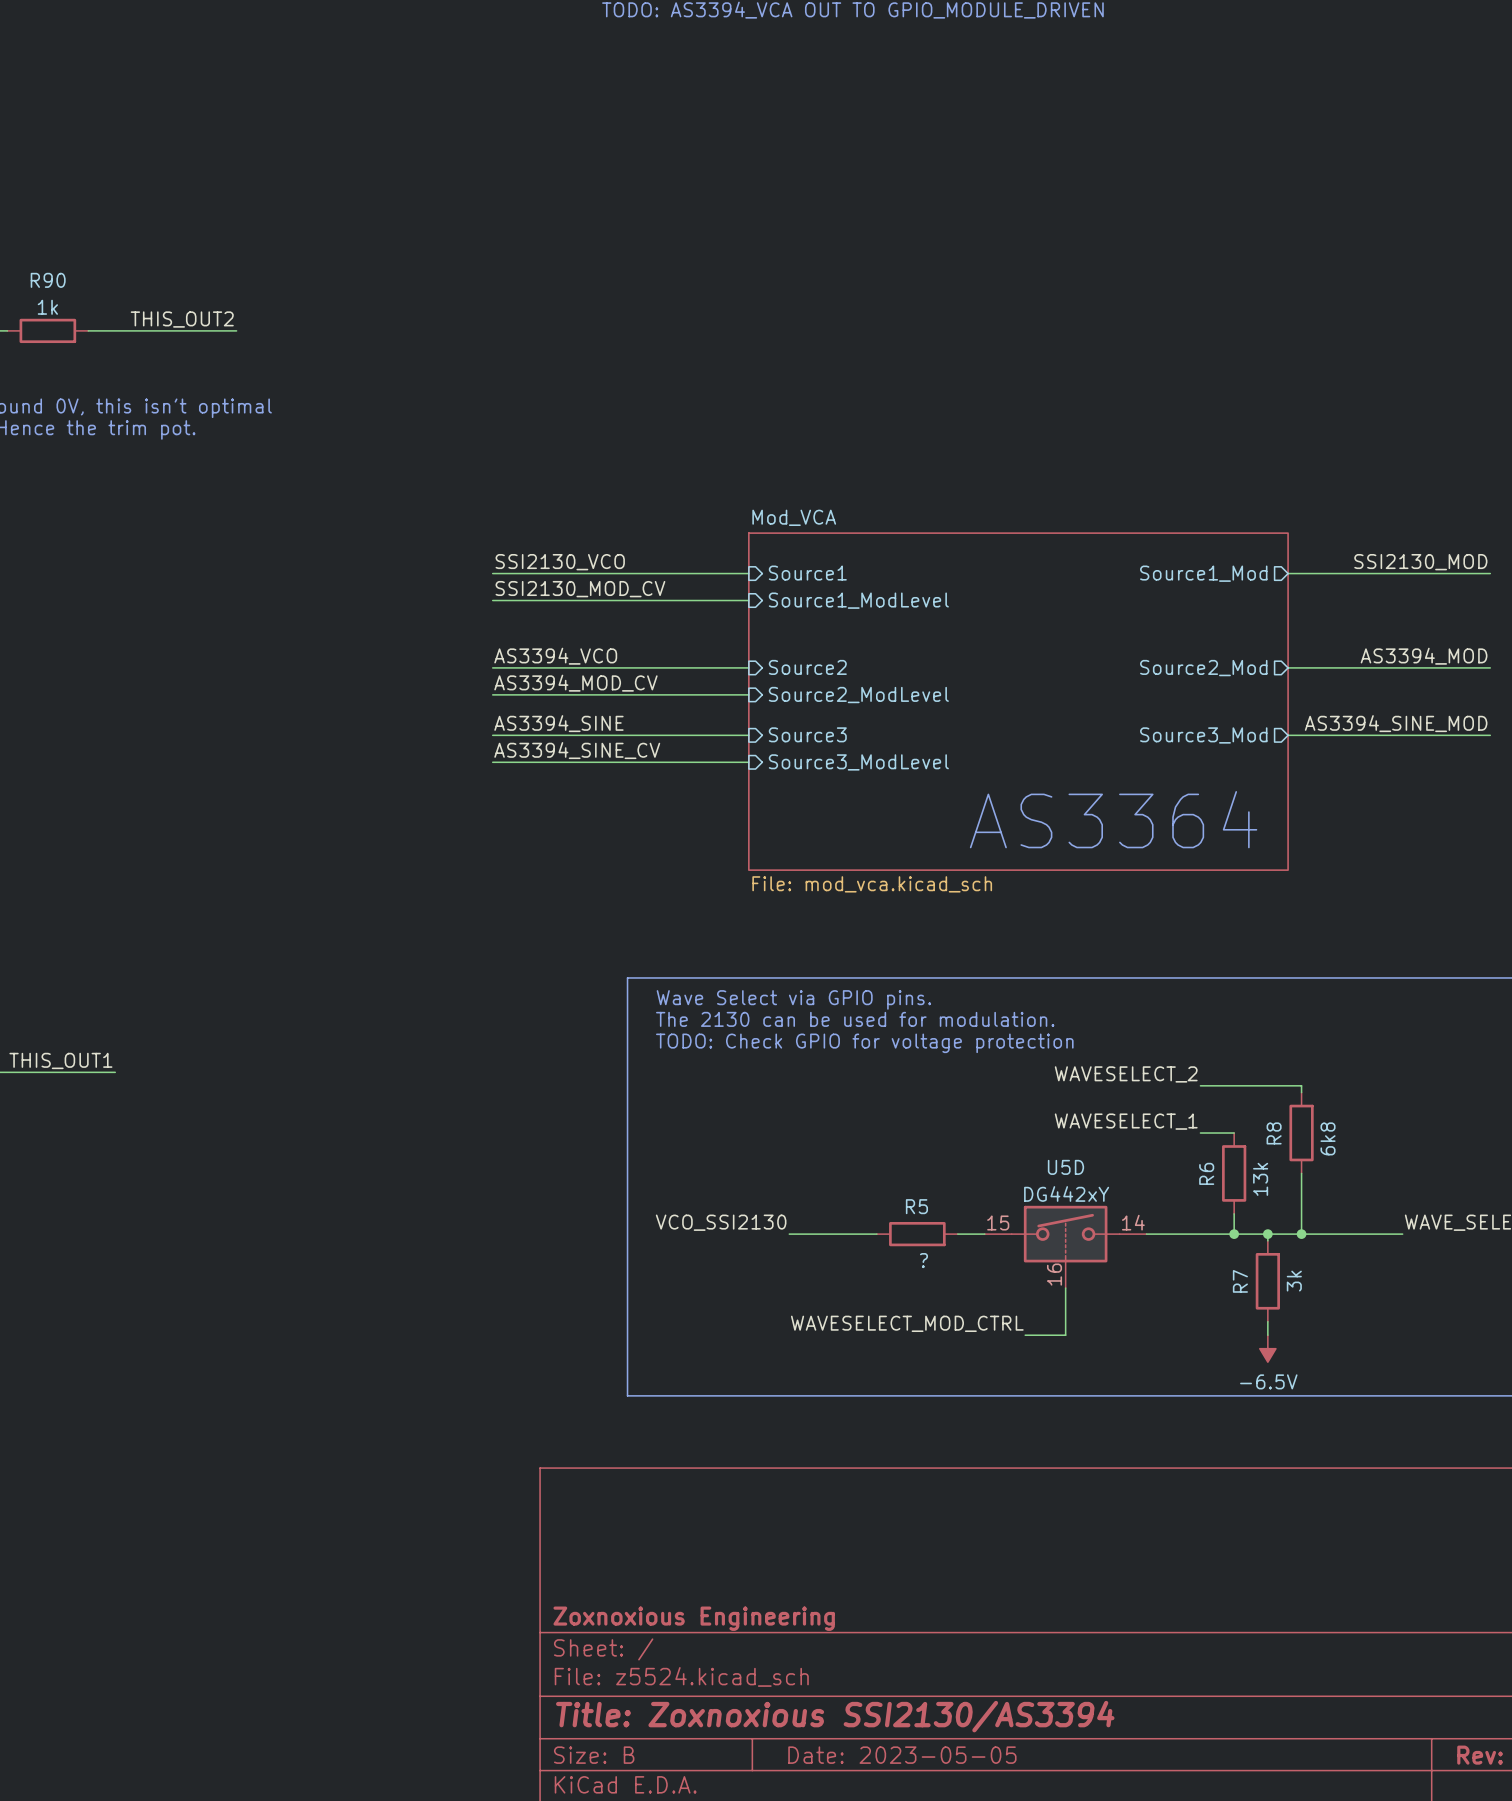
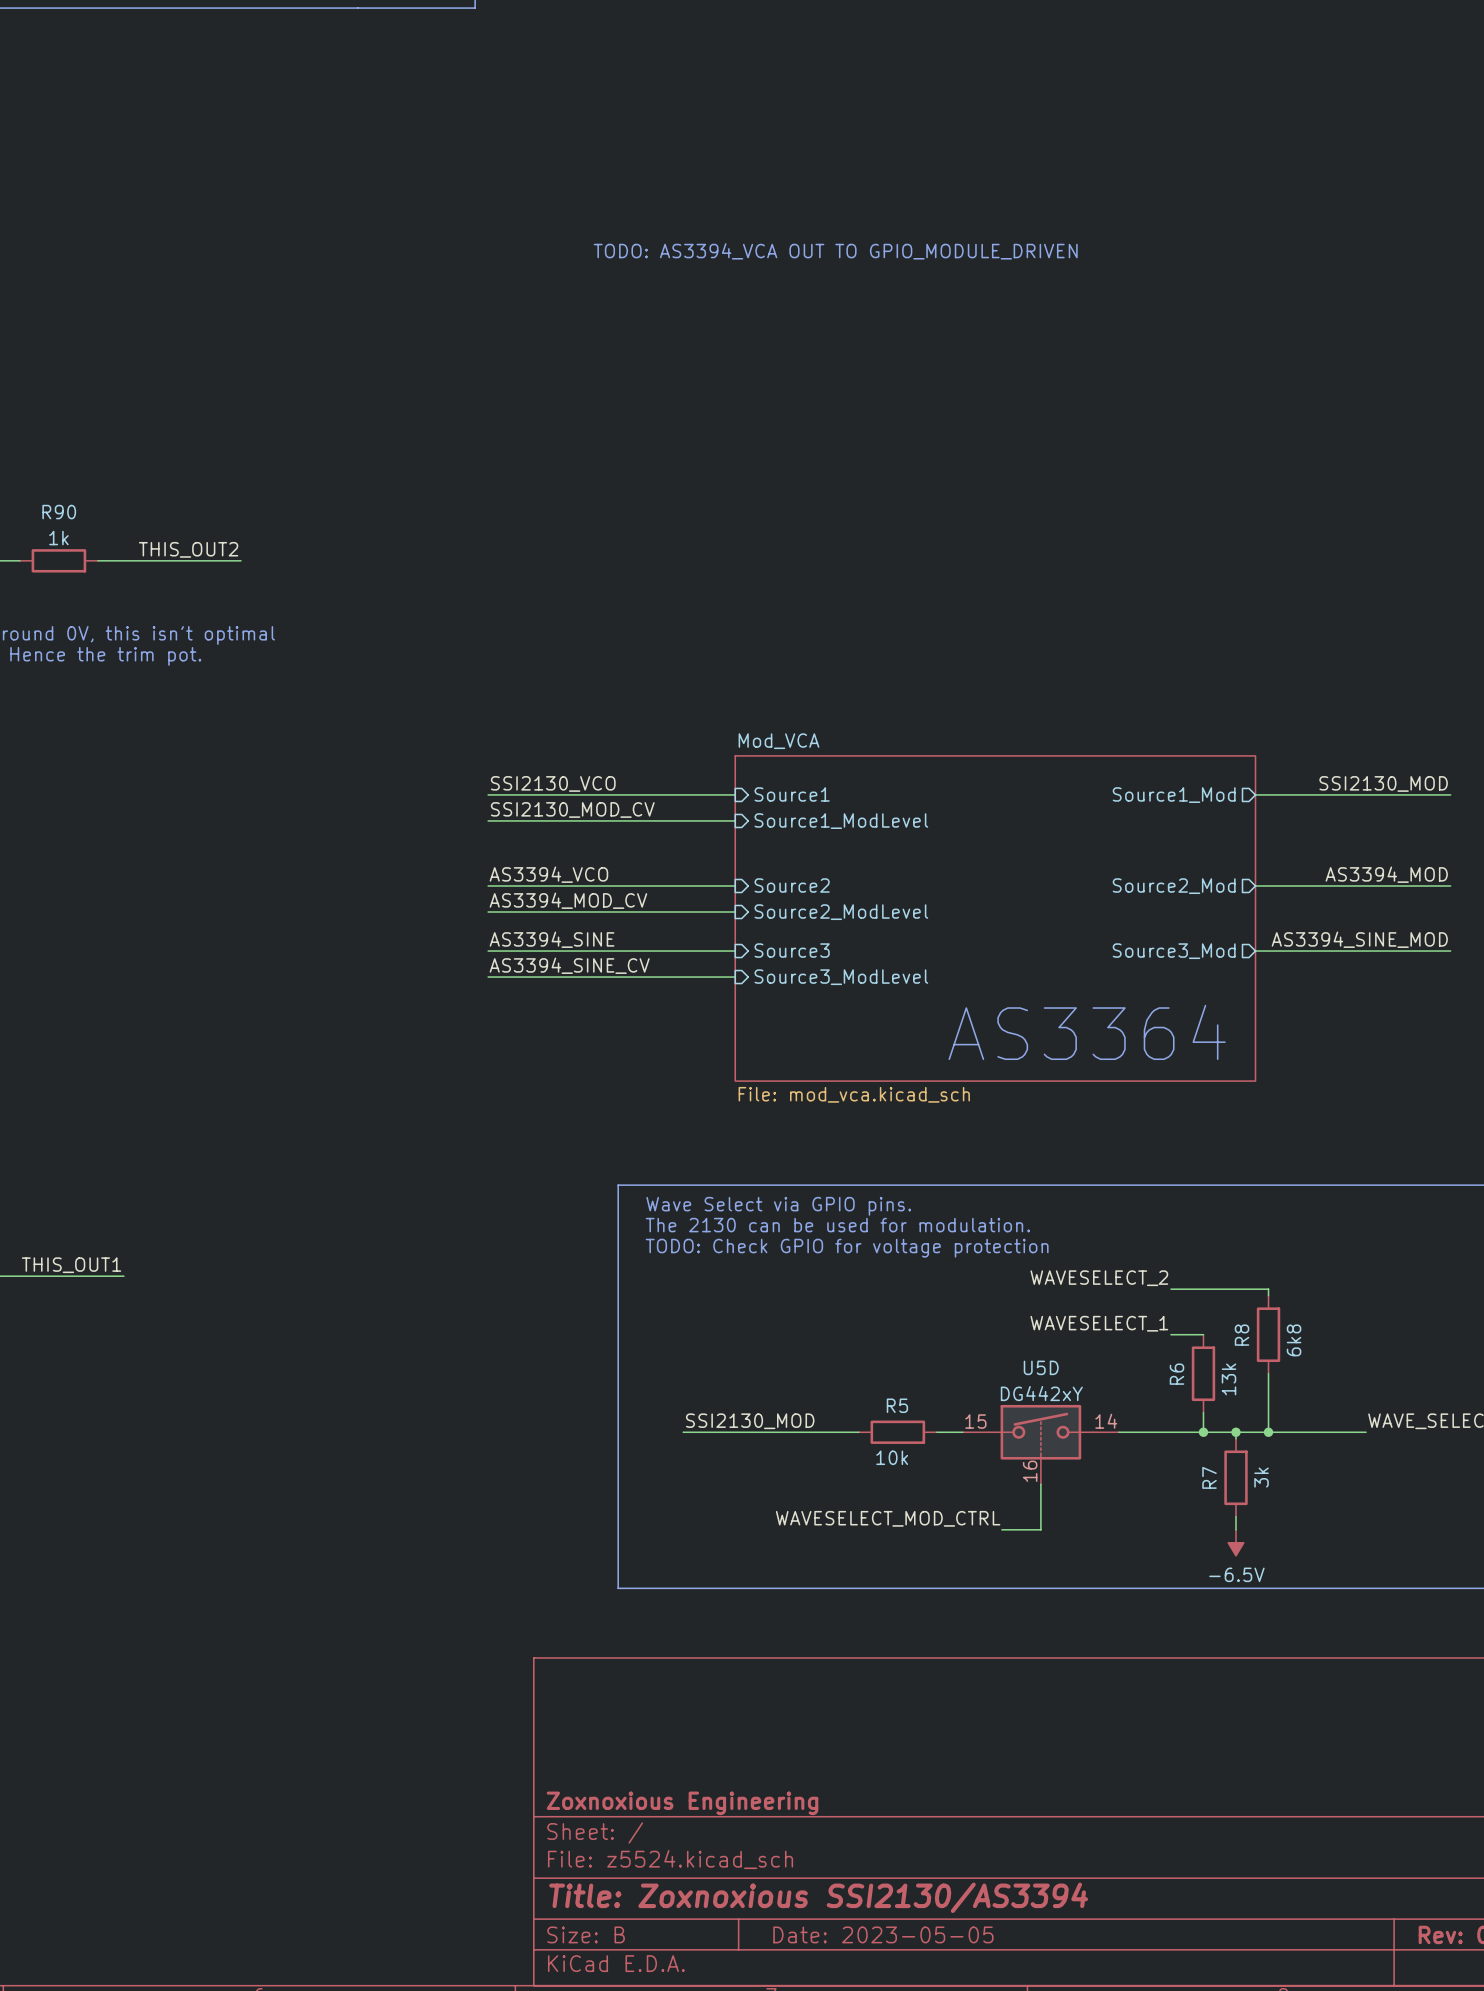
label: VCO_SSI2130 (721, 1222) -> SSI2130_MOD (750, 1421)
wire: none -> (683, 1432) (774, 1432)
R5 value: ? (924, 1260) -> 10k (892, 1457)

